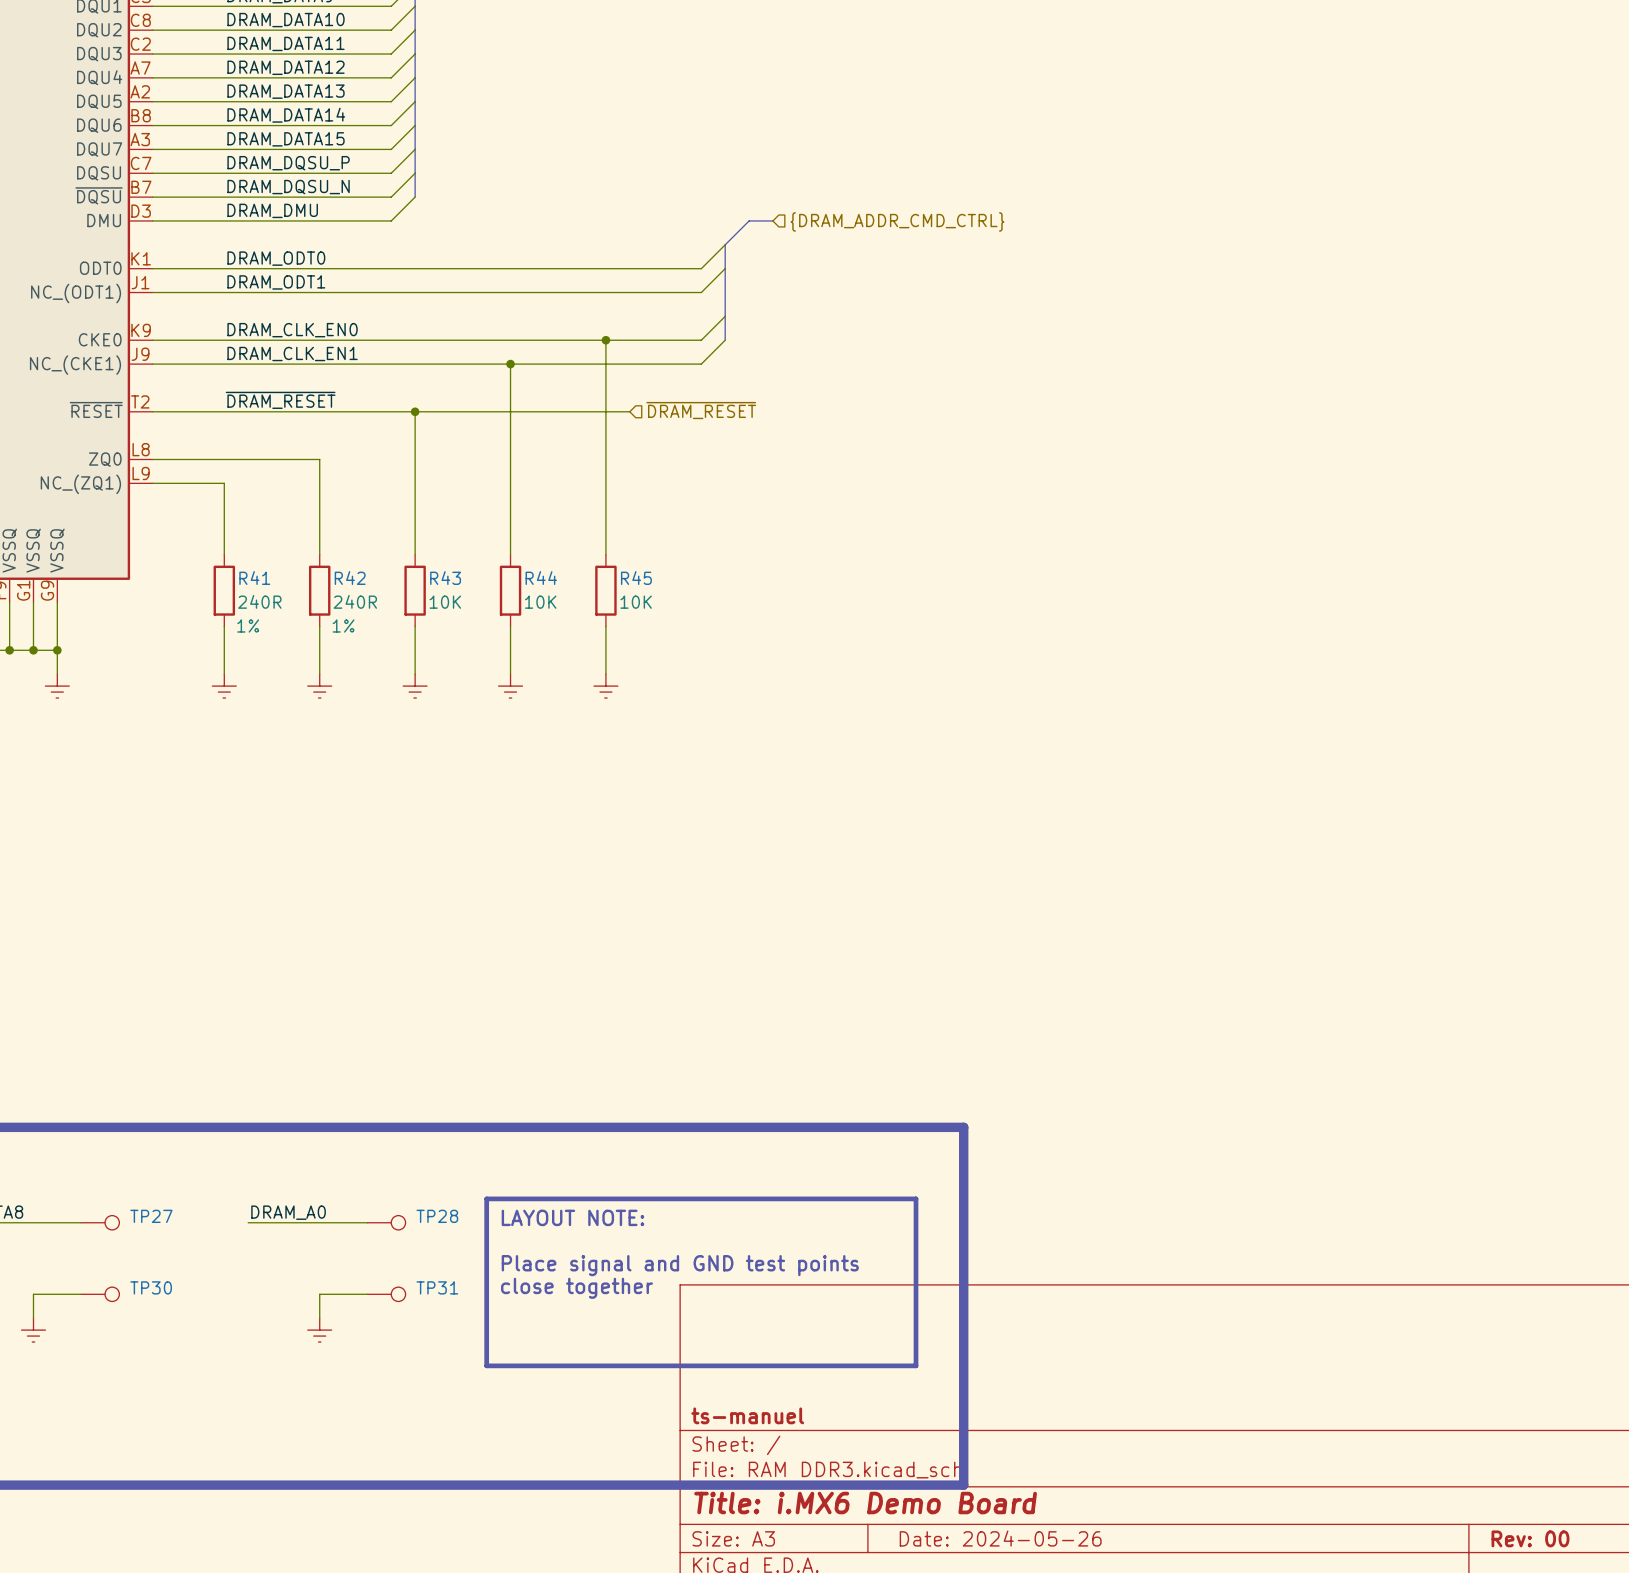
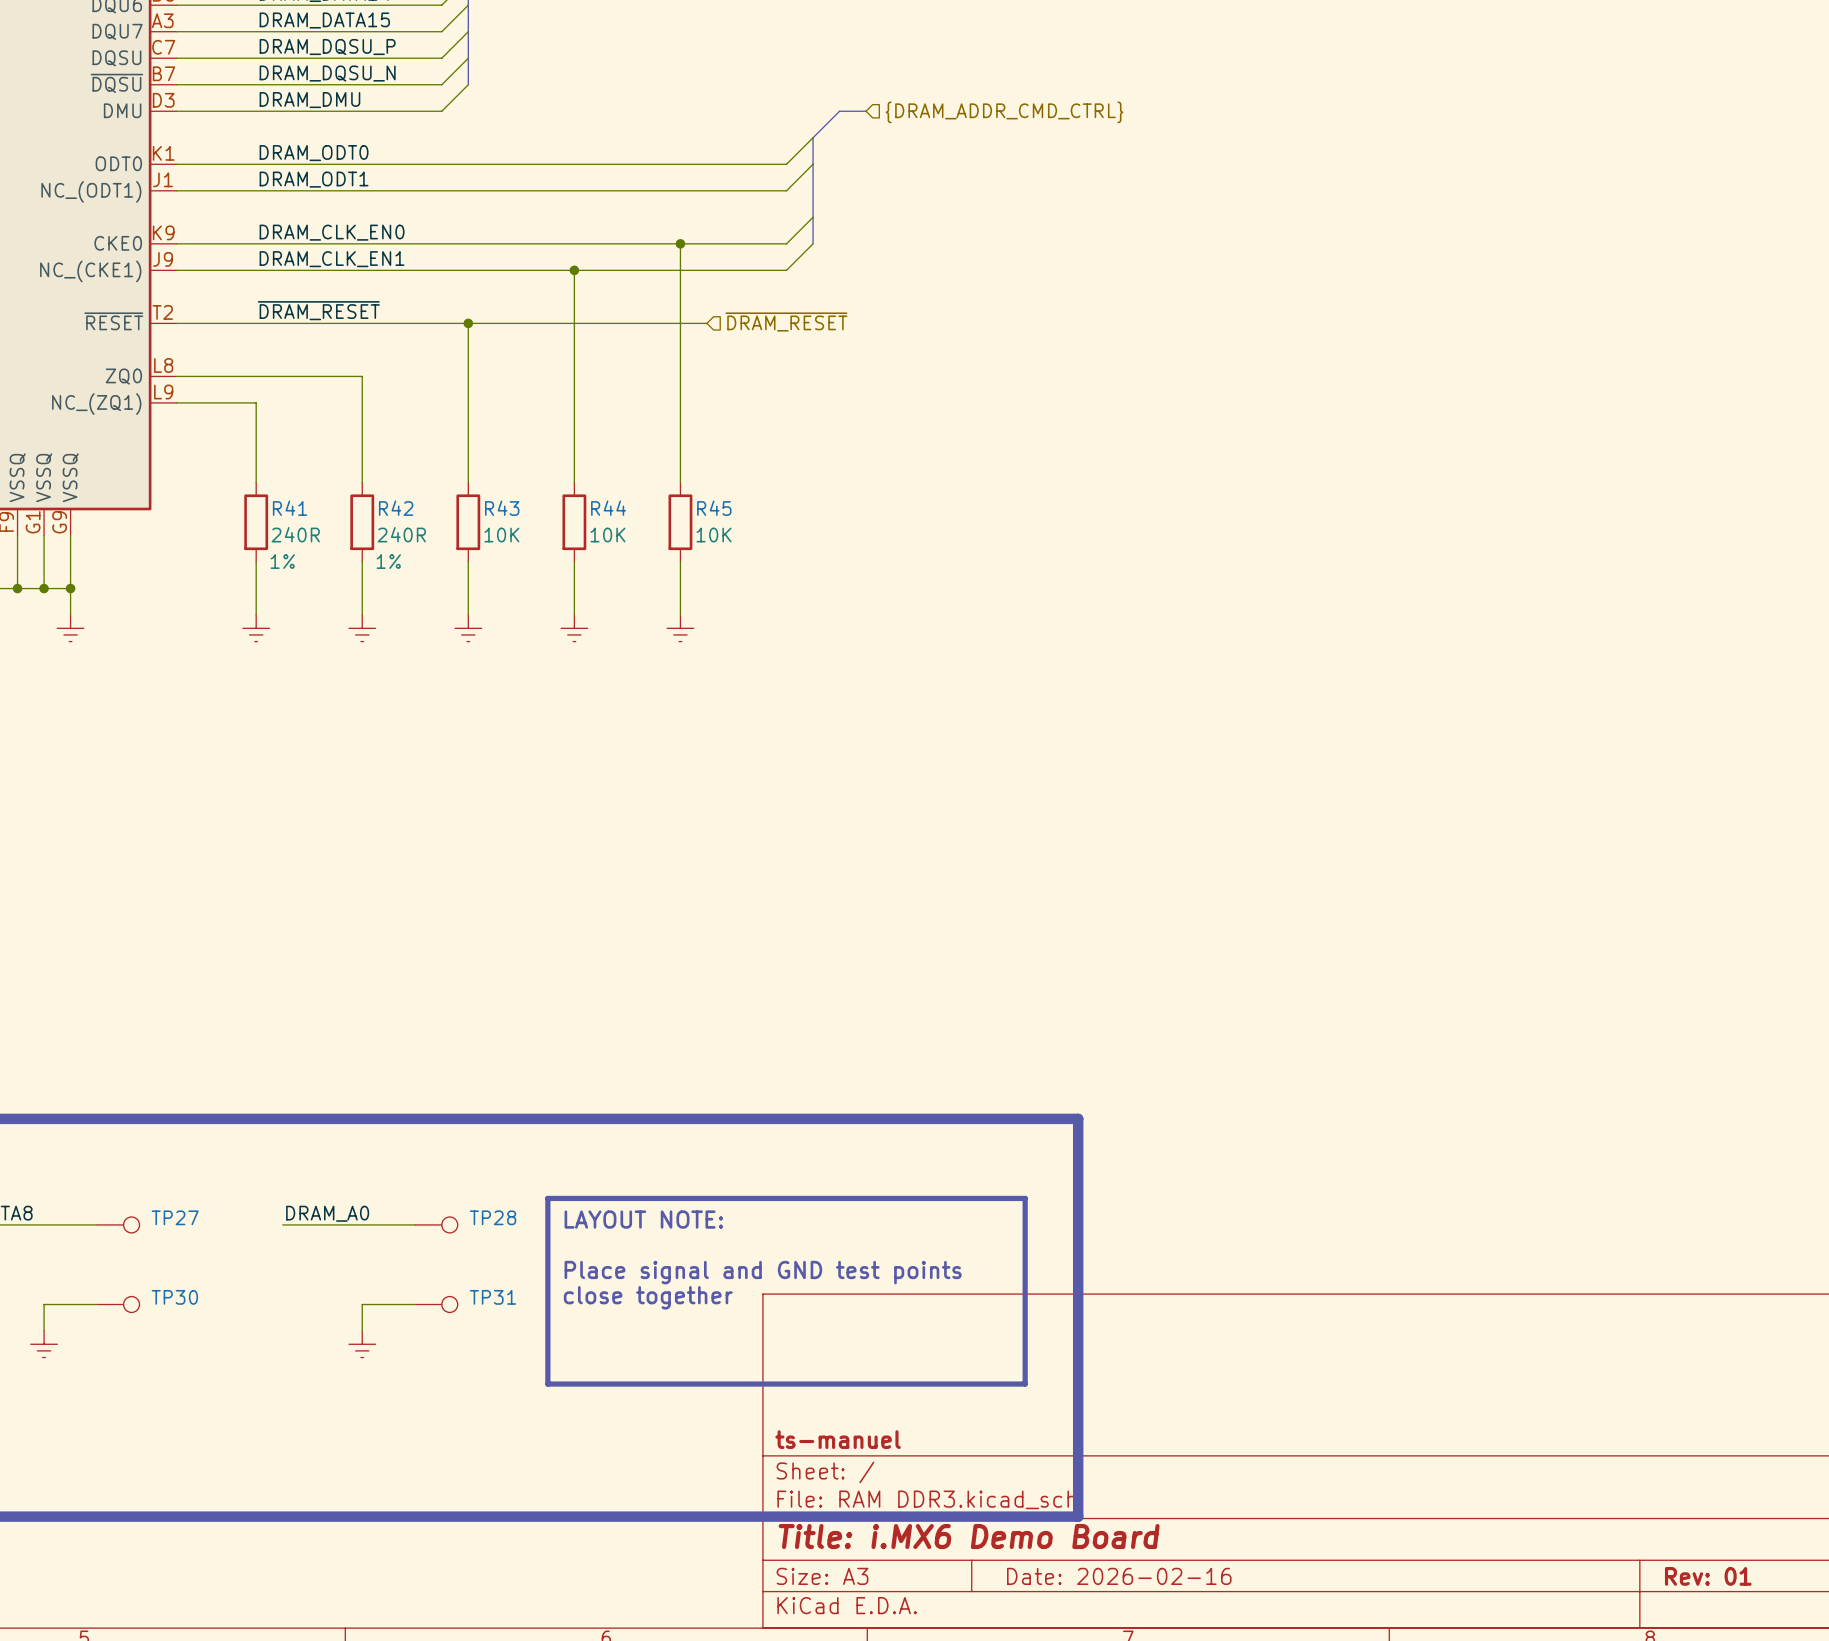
title block: Date: 2024-05-26 (1000, 1538) -> Date: 2026-02-16 (1119, 1576)
title block: Rev: 00 (1530, 1538) -> Rev: 01 (1708, 1576)

